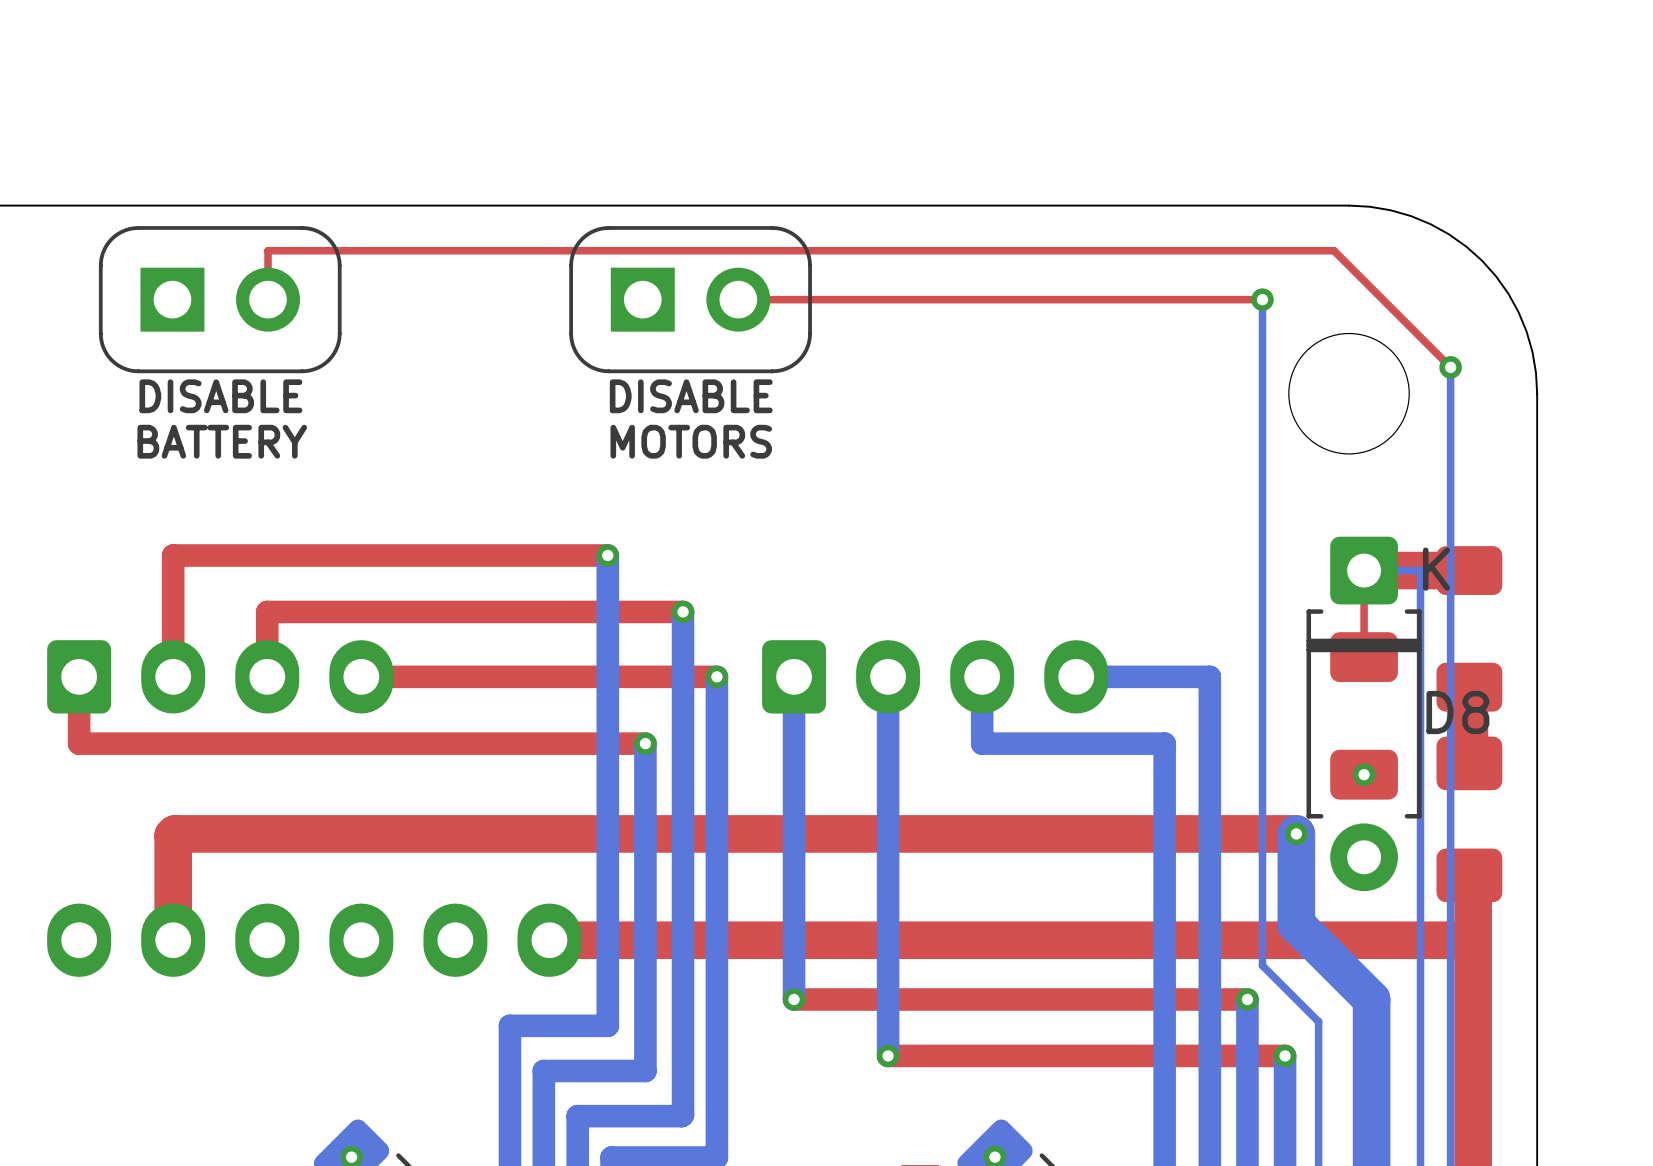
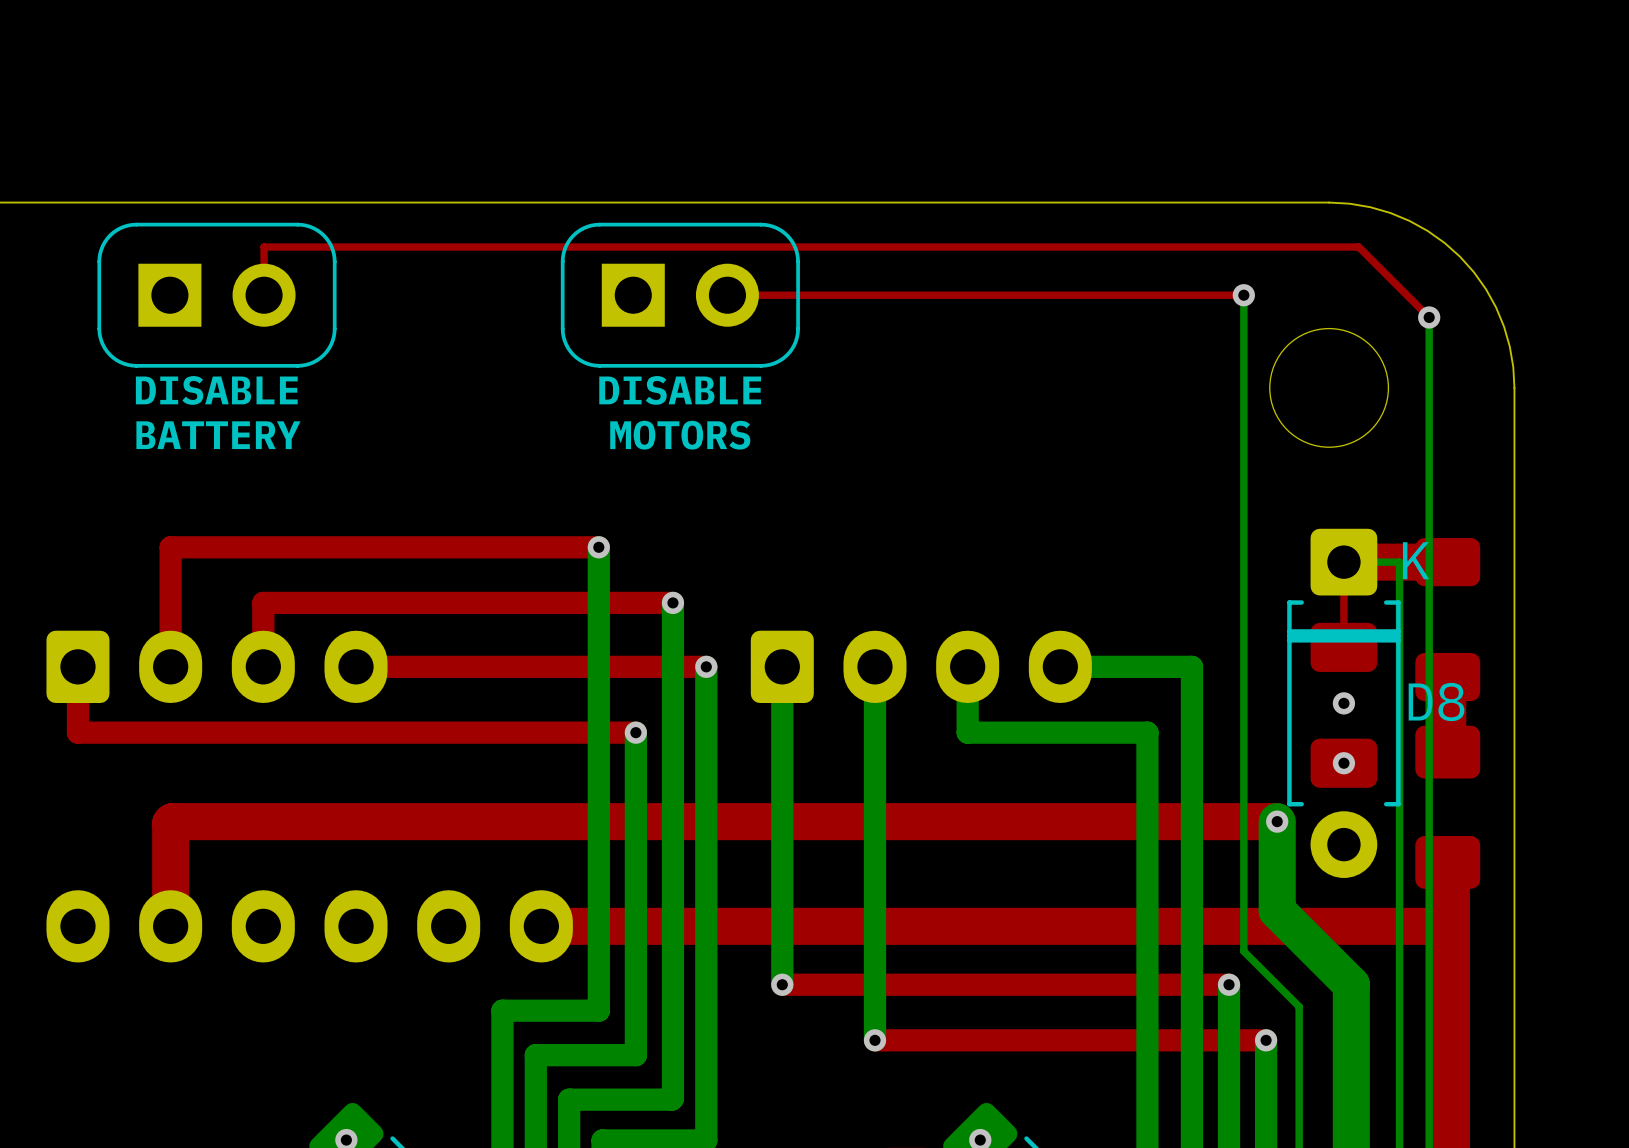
top track: (1333, 250) (1450, 367) -> (1314, 247) (1358, 247) (1429, 317)
bottom track: none -> (1429, 317) (1429, 361)
via position: (1450, 367) -> (1429, 317)
via: none -> (1343, 703)

